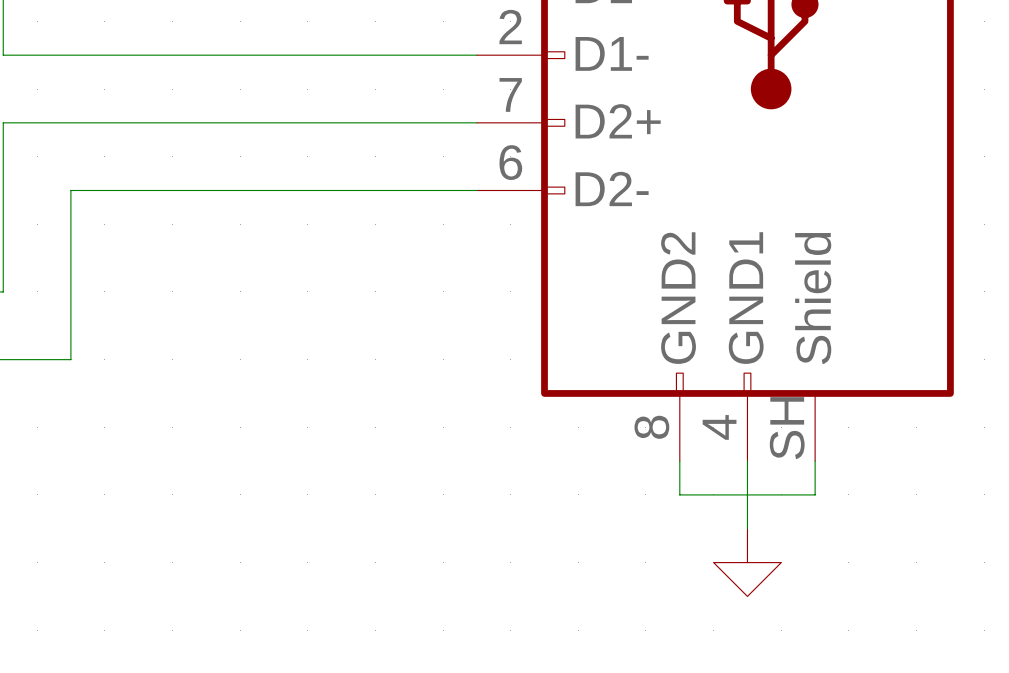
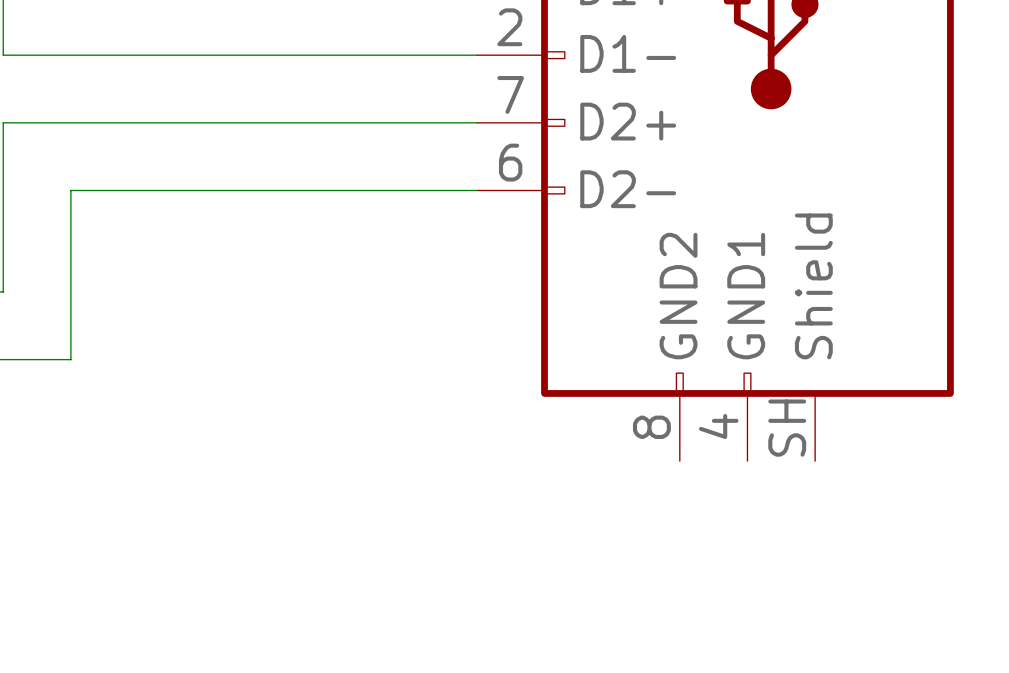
wire: (679, 461) (679, 494) (815, 494) (815, 461) -> none
wire: (747, 461) (747, 528) -> none
power symbol: (747, 562) -> none

